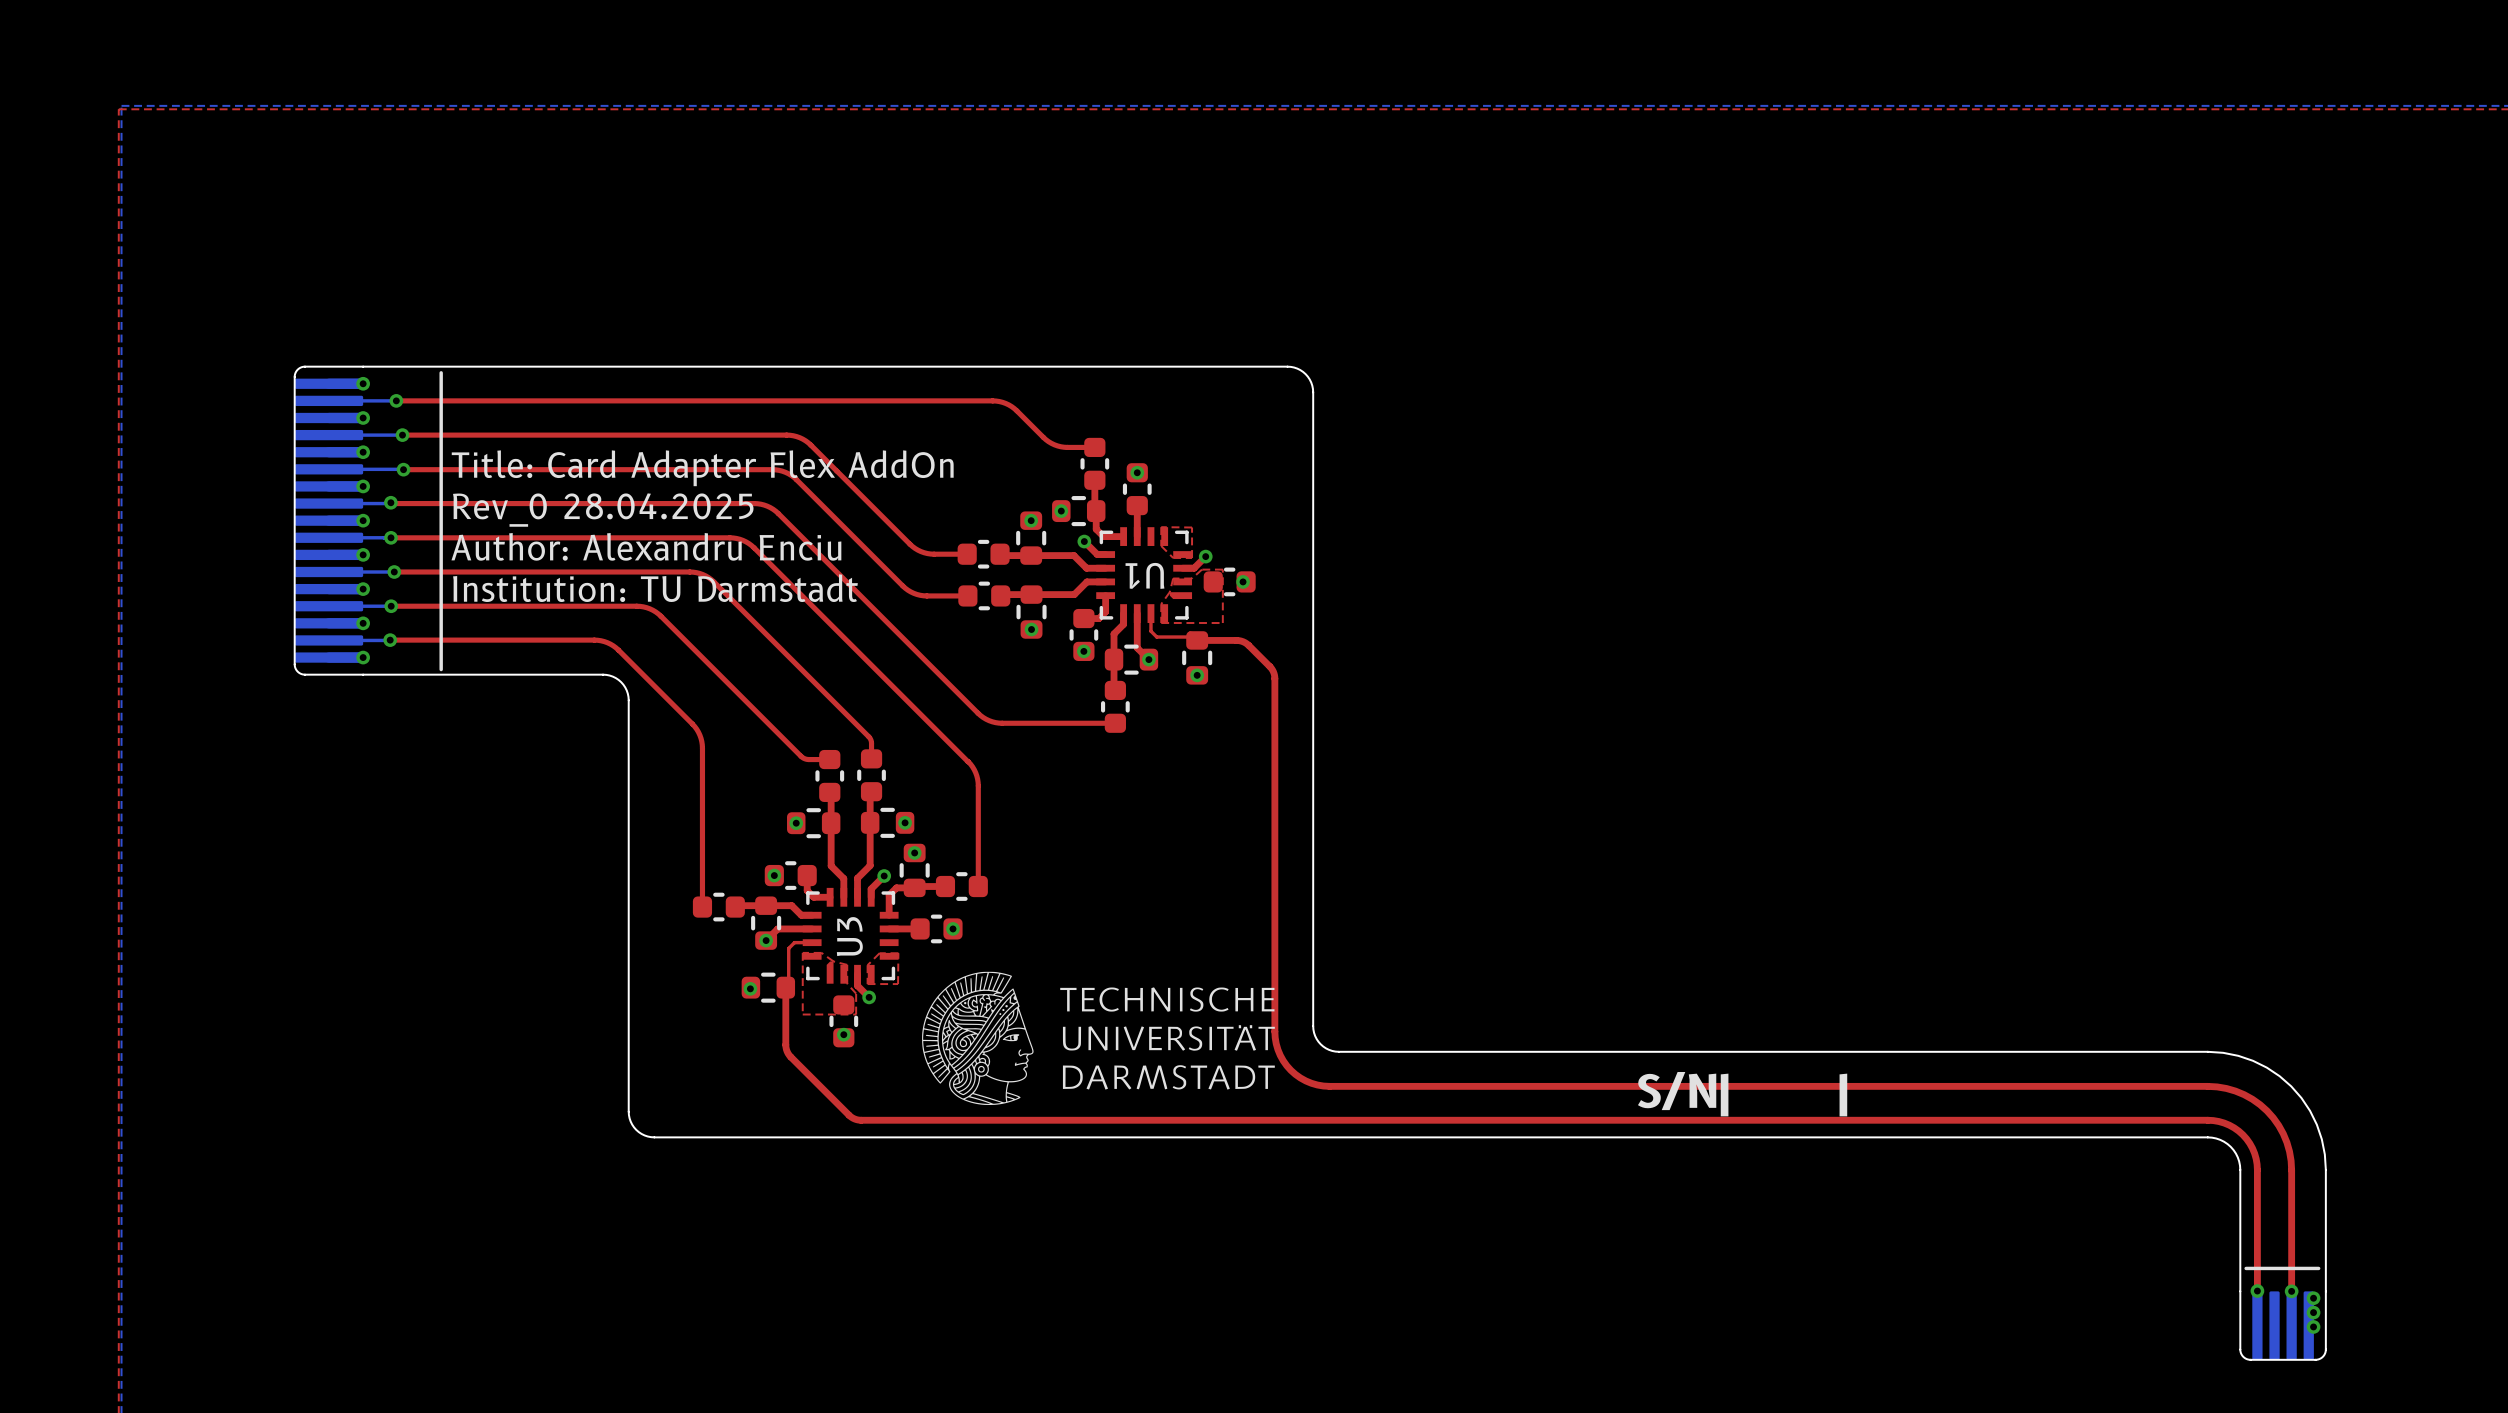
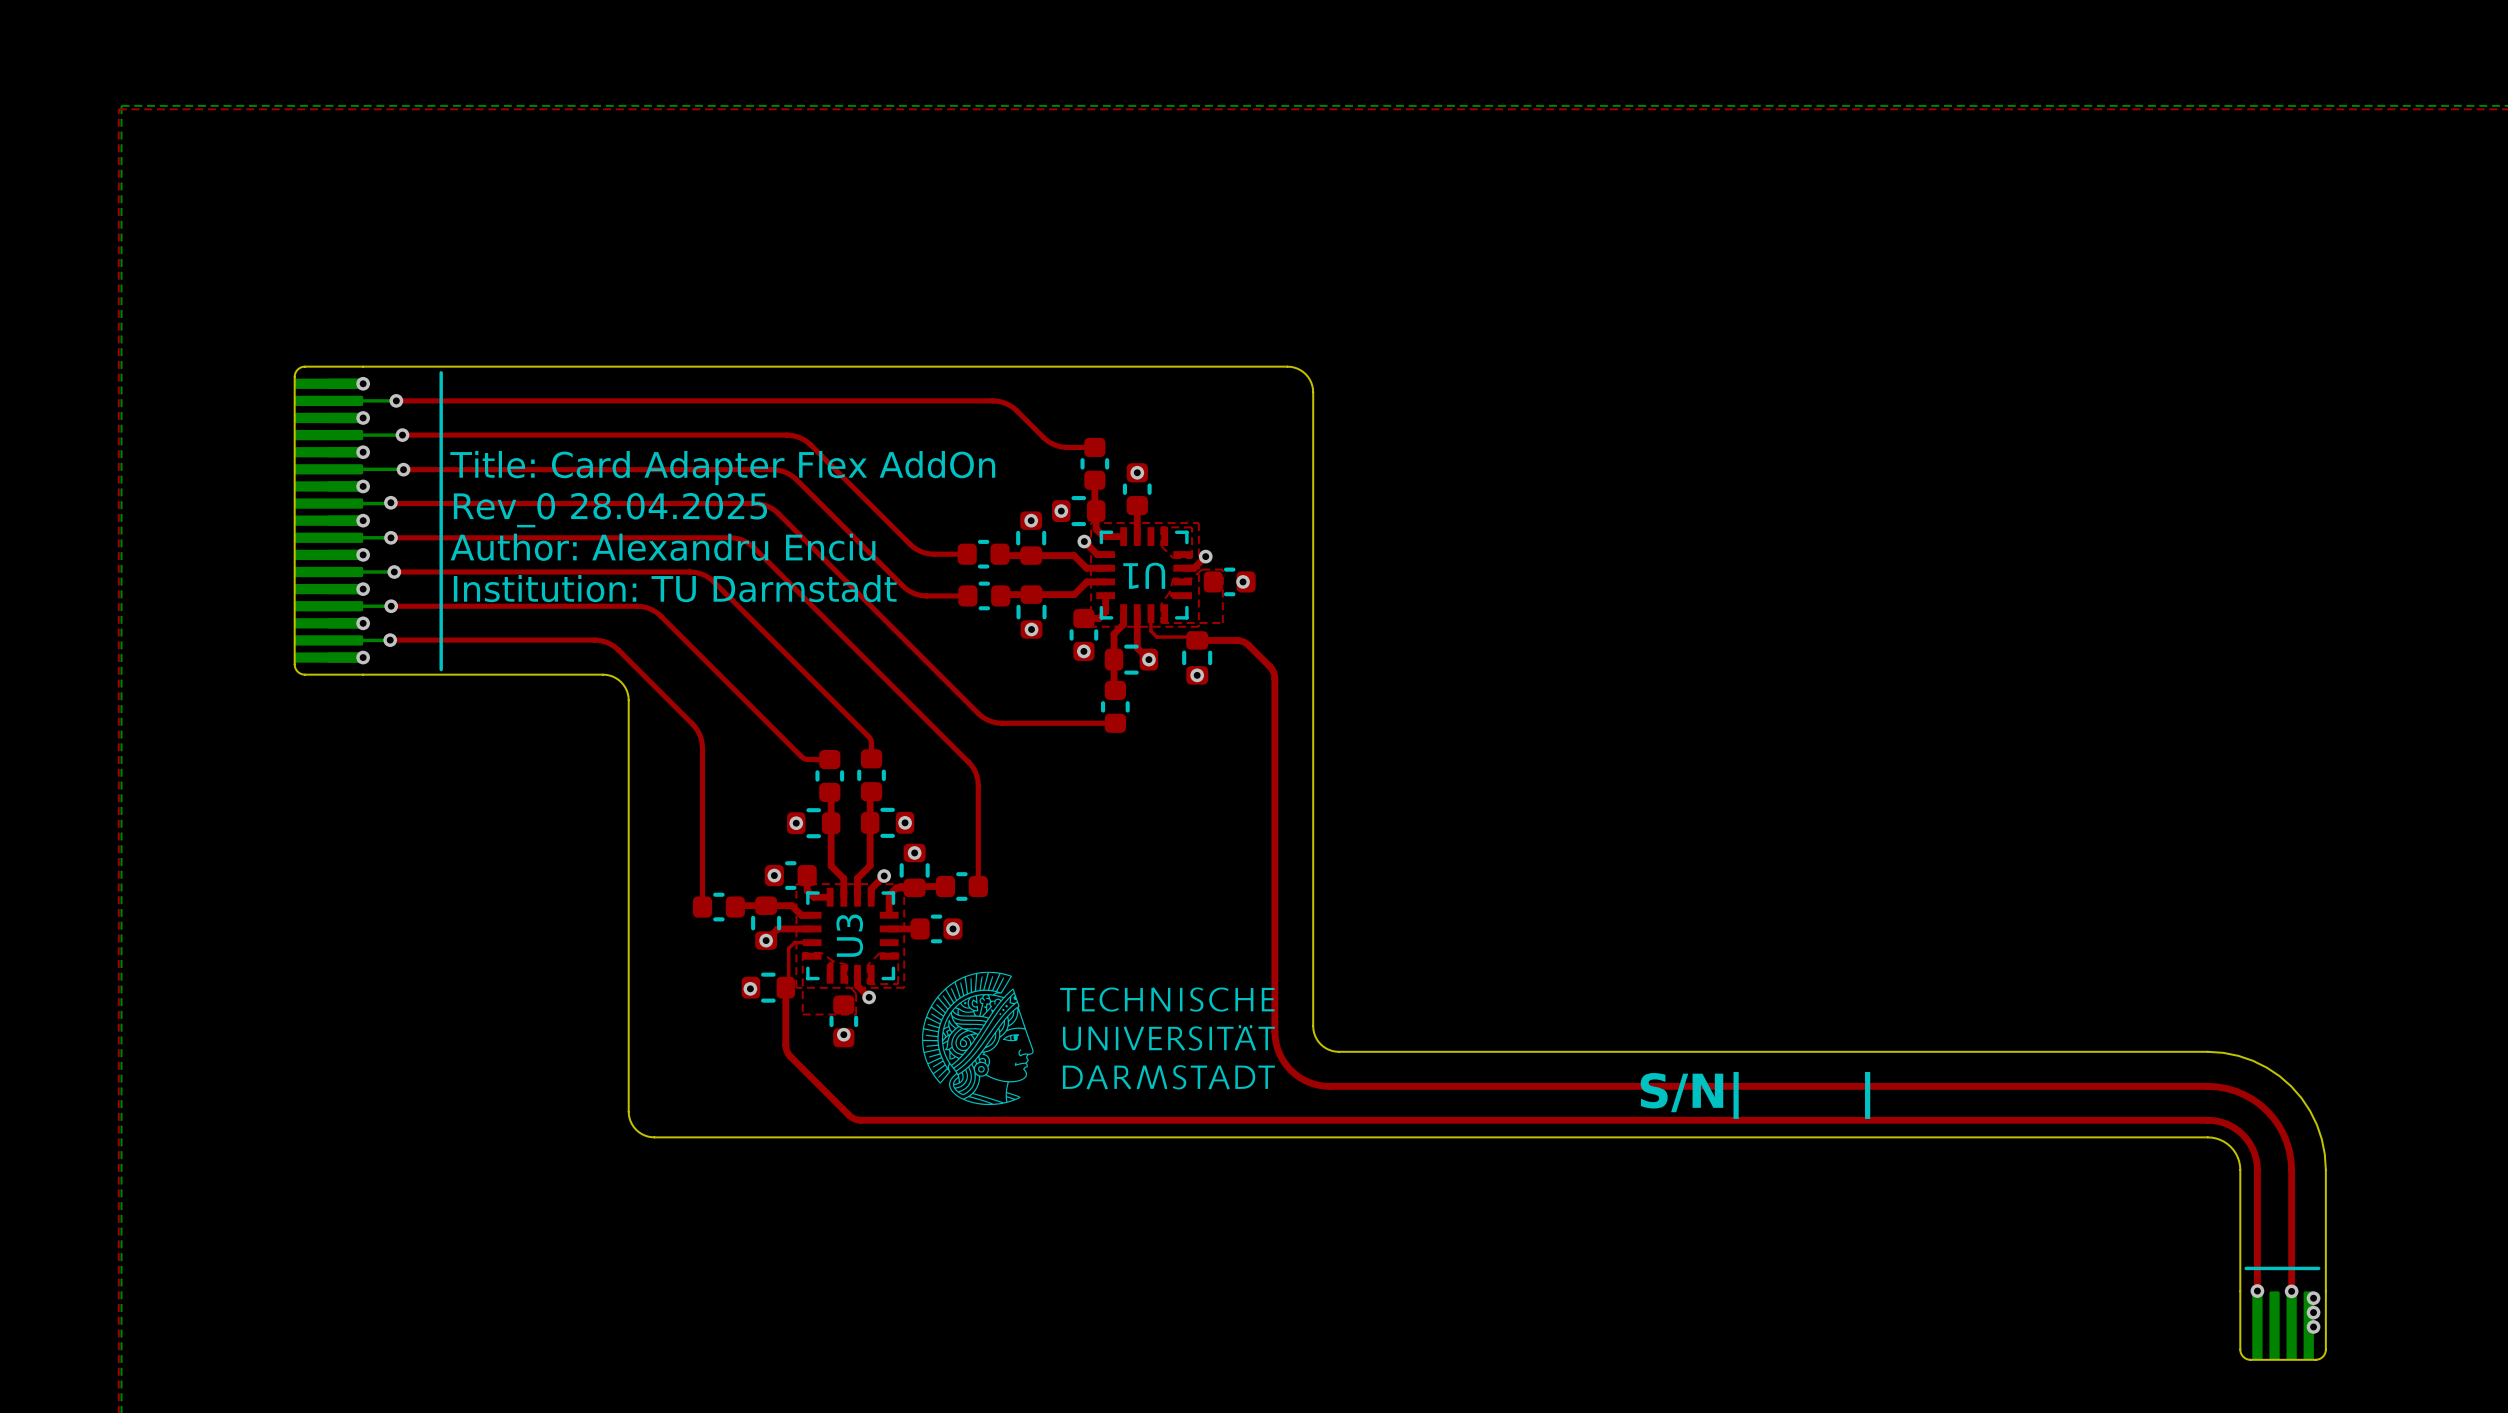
top zone outline: none -> (1091, 523) (1198, 523) (1198, 626) (1091, 626) (1091, 523)
top zone outline: none -> (796, 884) (904, 884) (904, 987) (796, 987) (796, 884)

